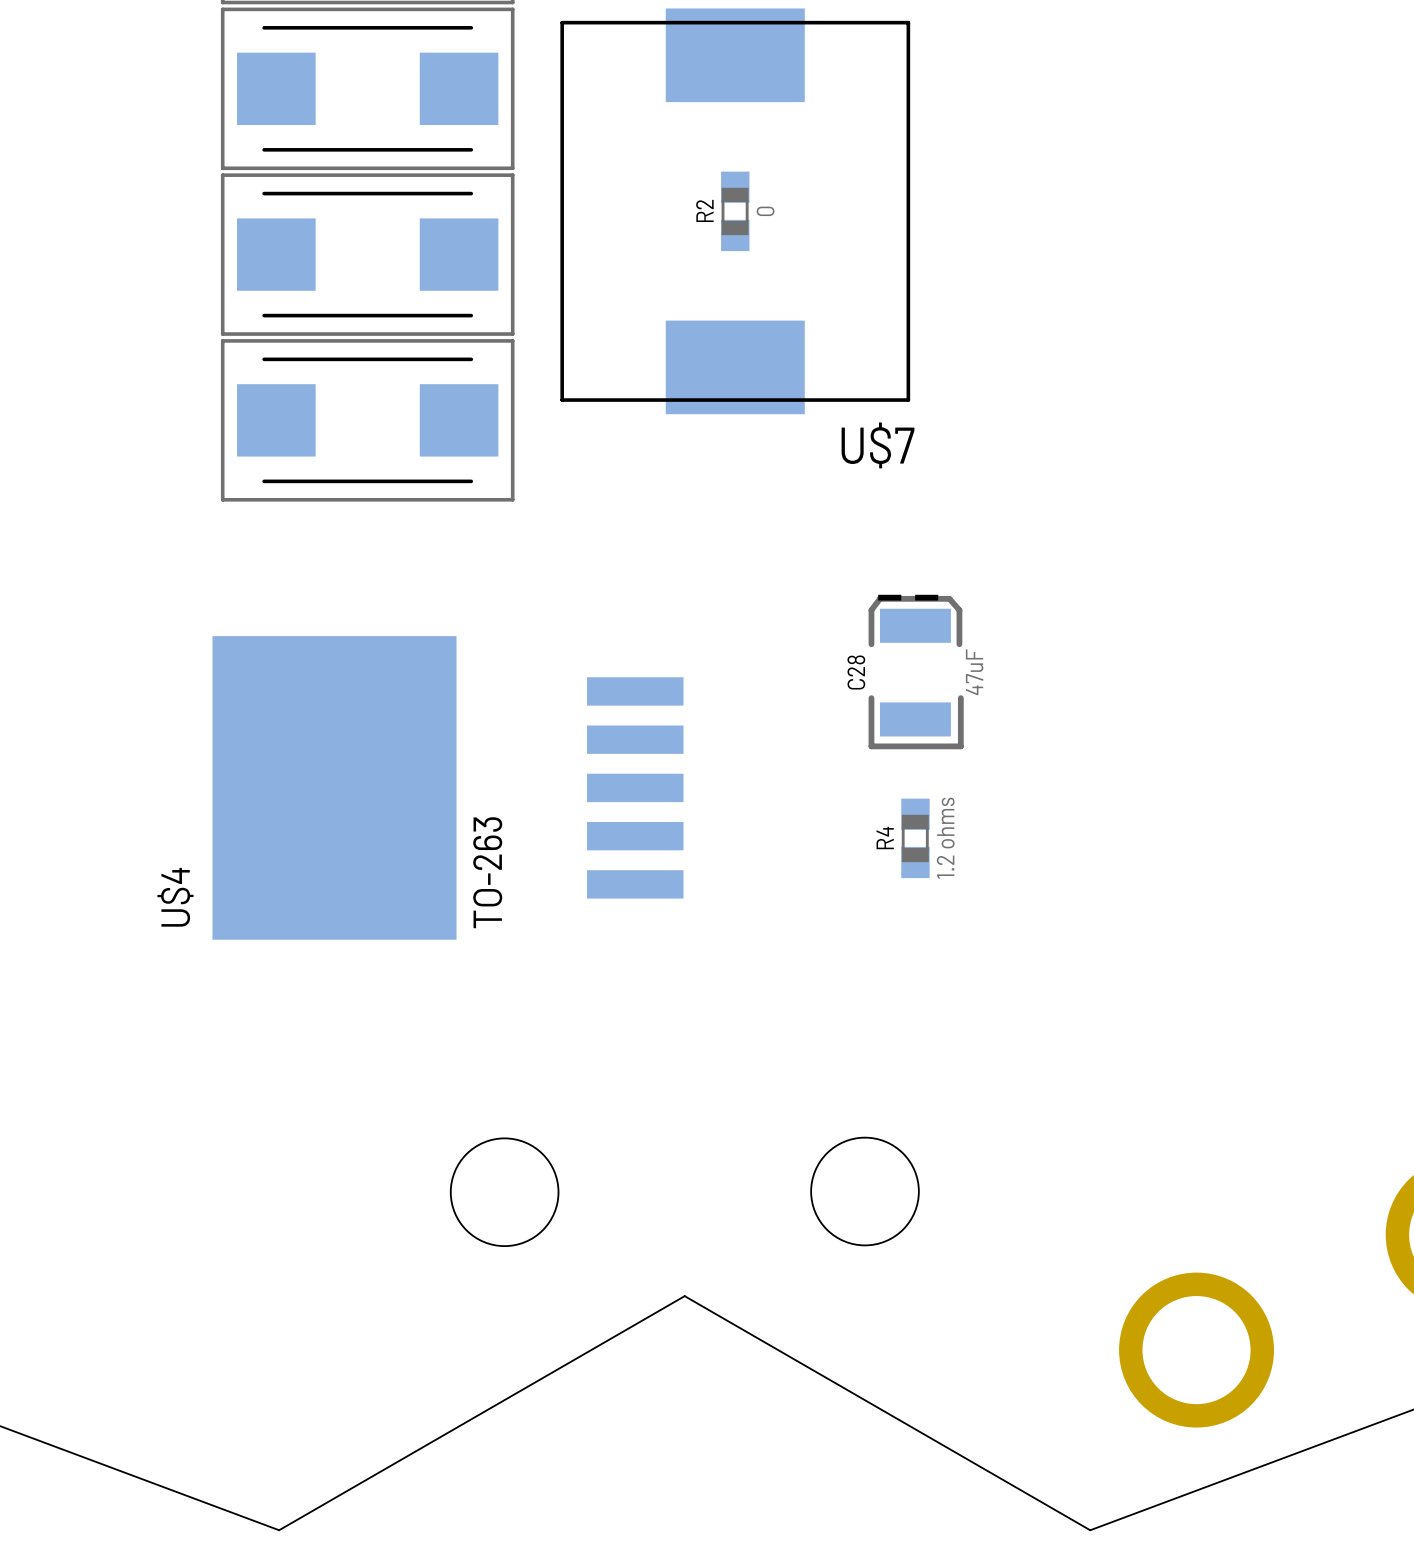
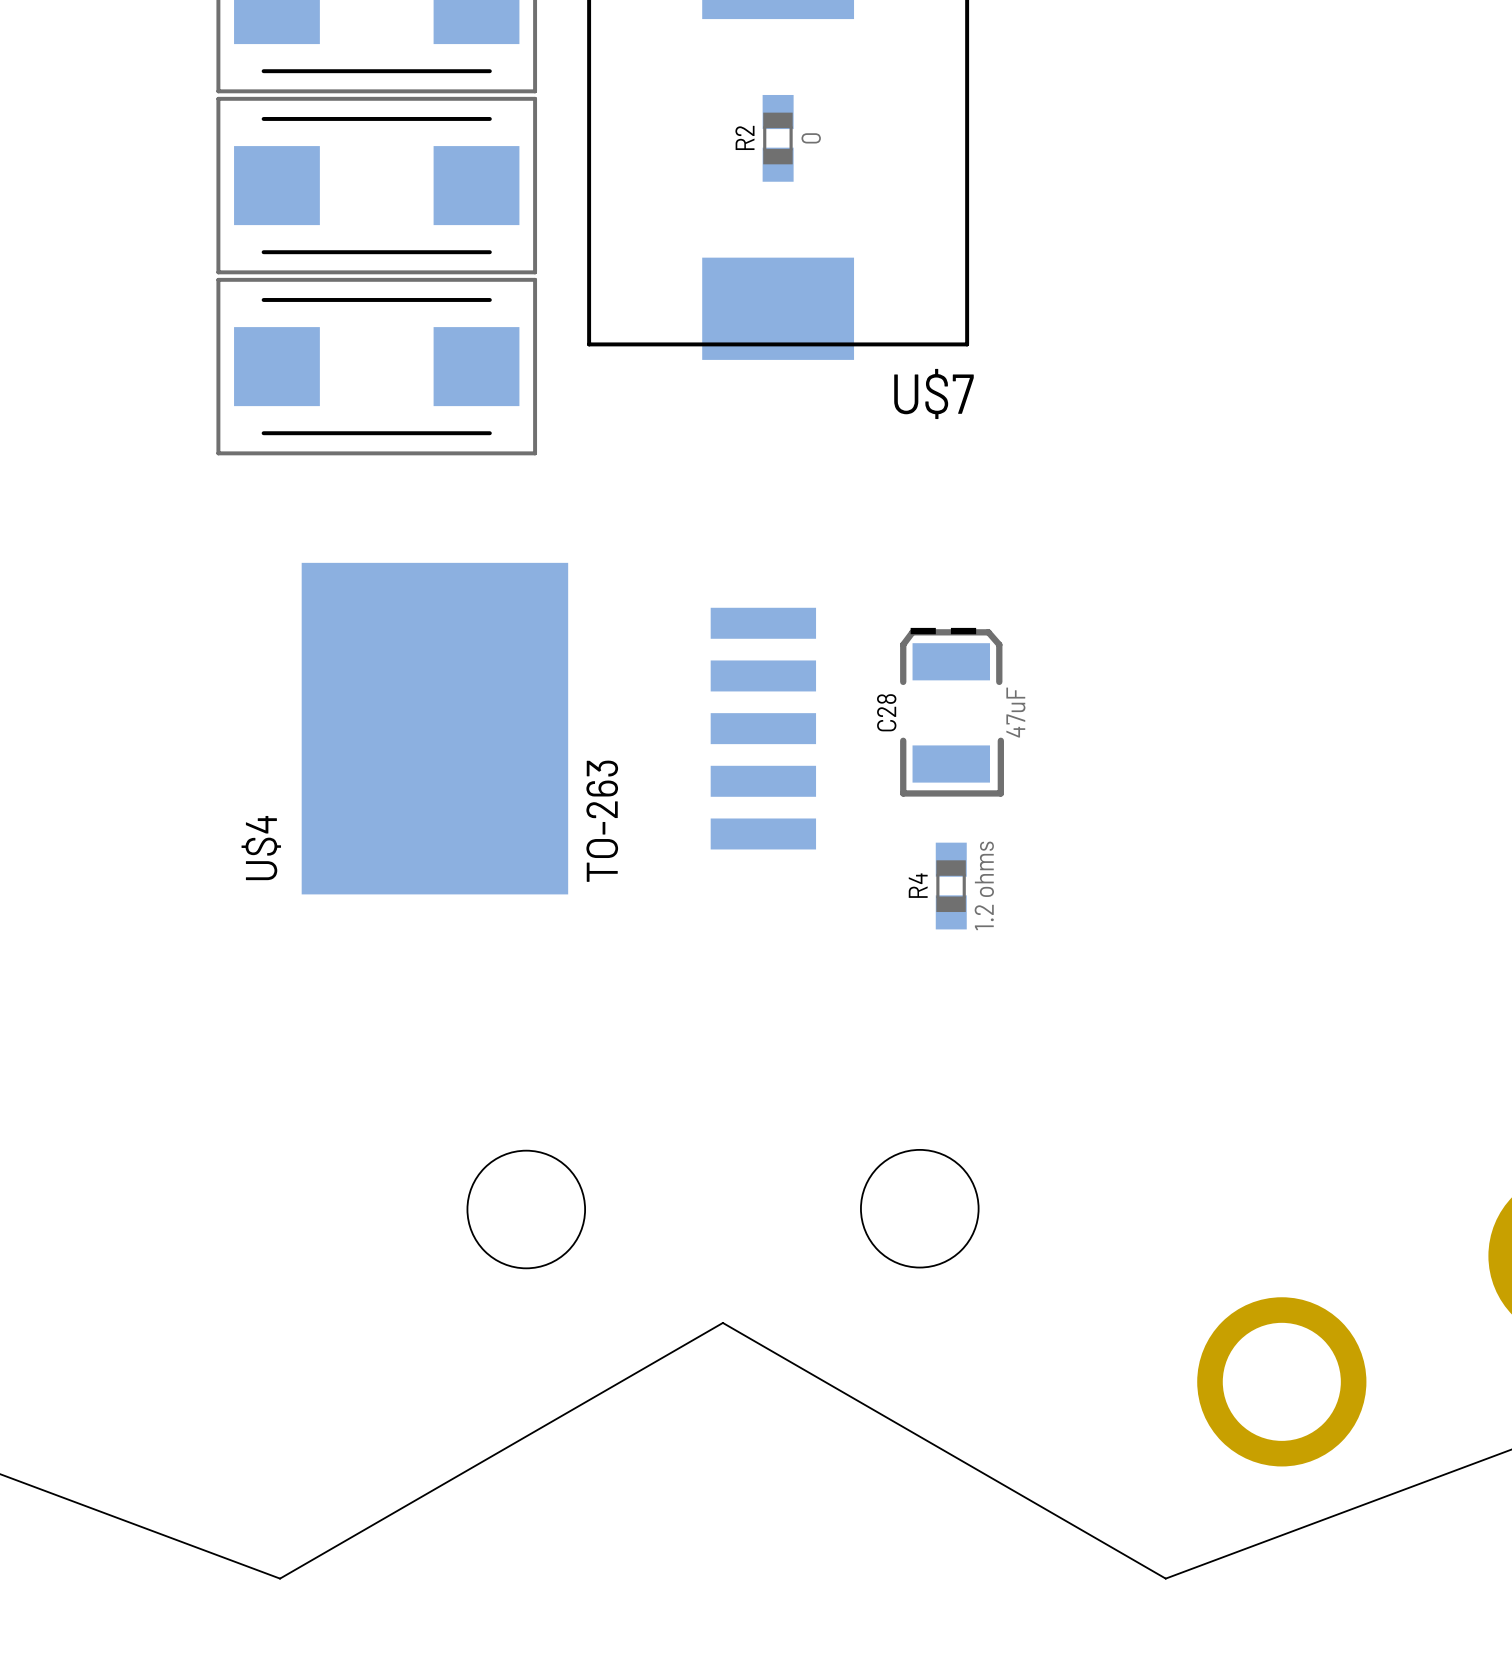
C28 position: (916, 672) -> (952, 712)
U$4 position: (448, 787) -> (558, 728)
R4 position: (915, 838) -> (951, 886)

